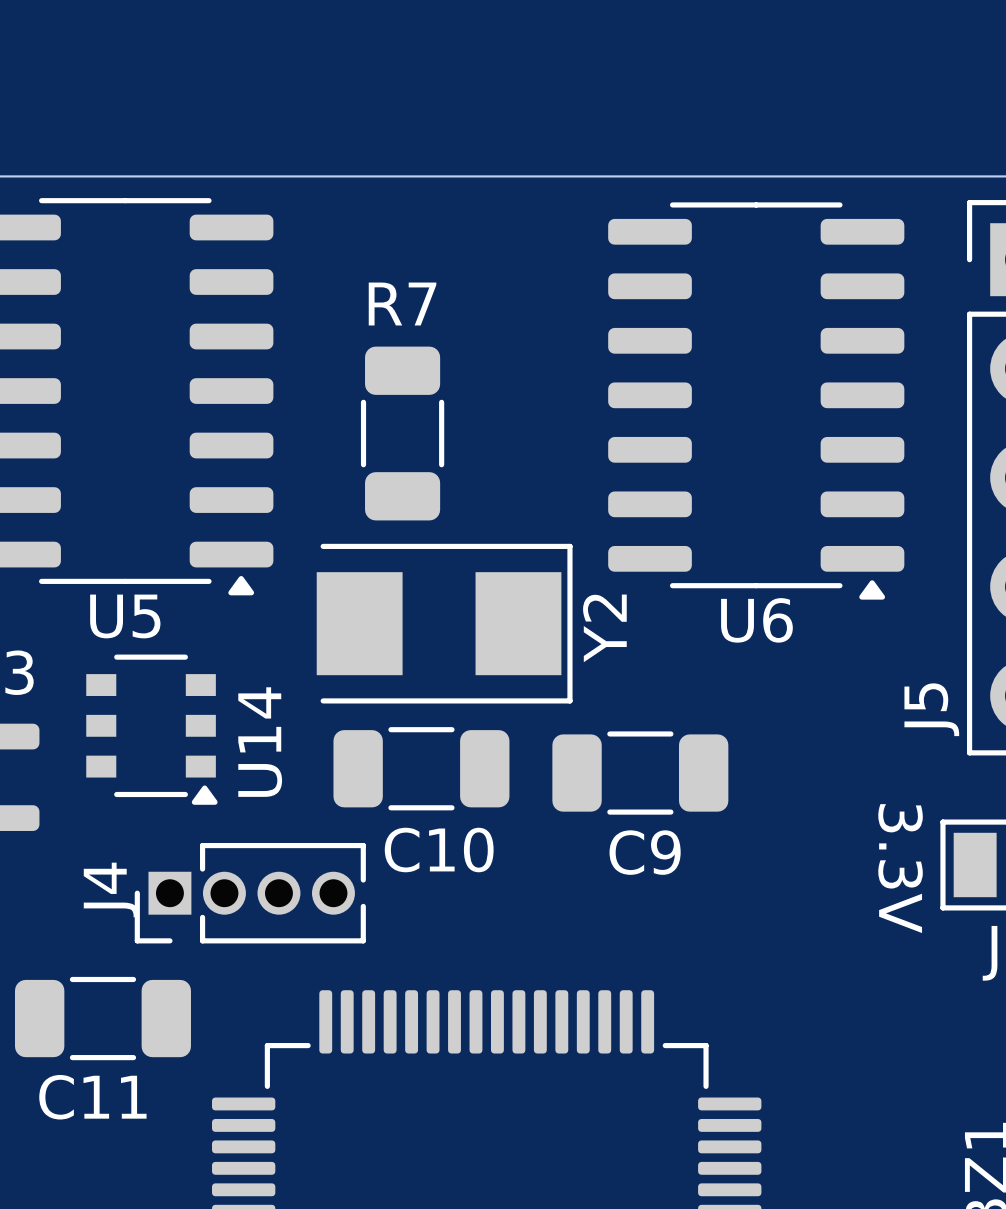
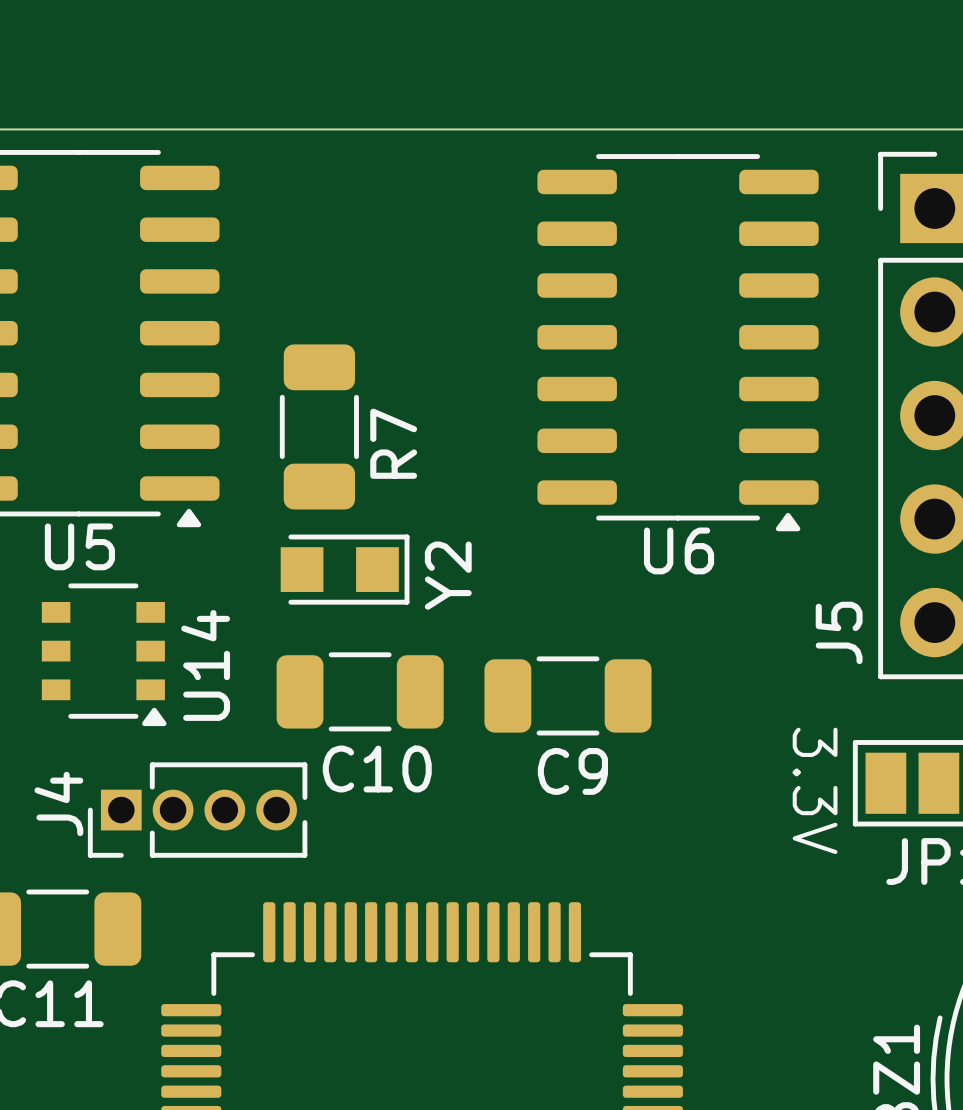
R7 name rotation: 0° (402, 304) -> 90° counterclockwise (393, 443)
R7 name position: R7 (402, 304) -> R7 (393, 443)
R7 position: (402, 433) -> (319, 426)
Y2 footprint: [316, 543, 573, 704] -> [280, 534, 410, 605]

